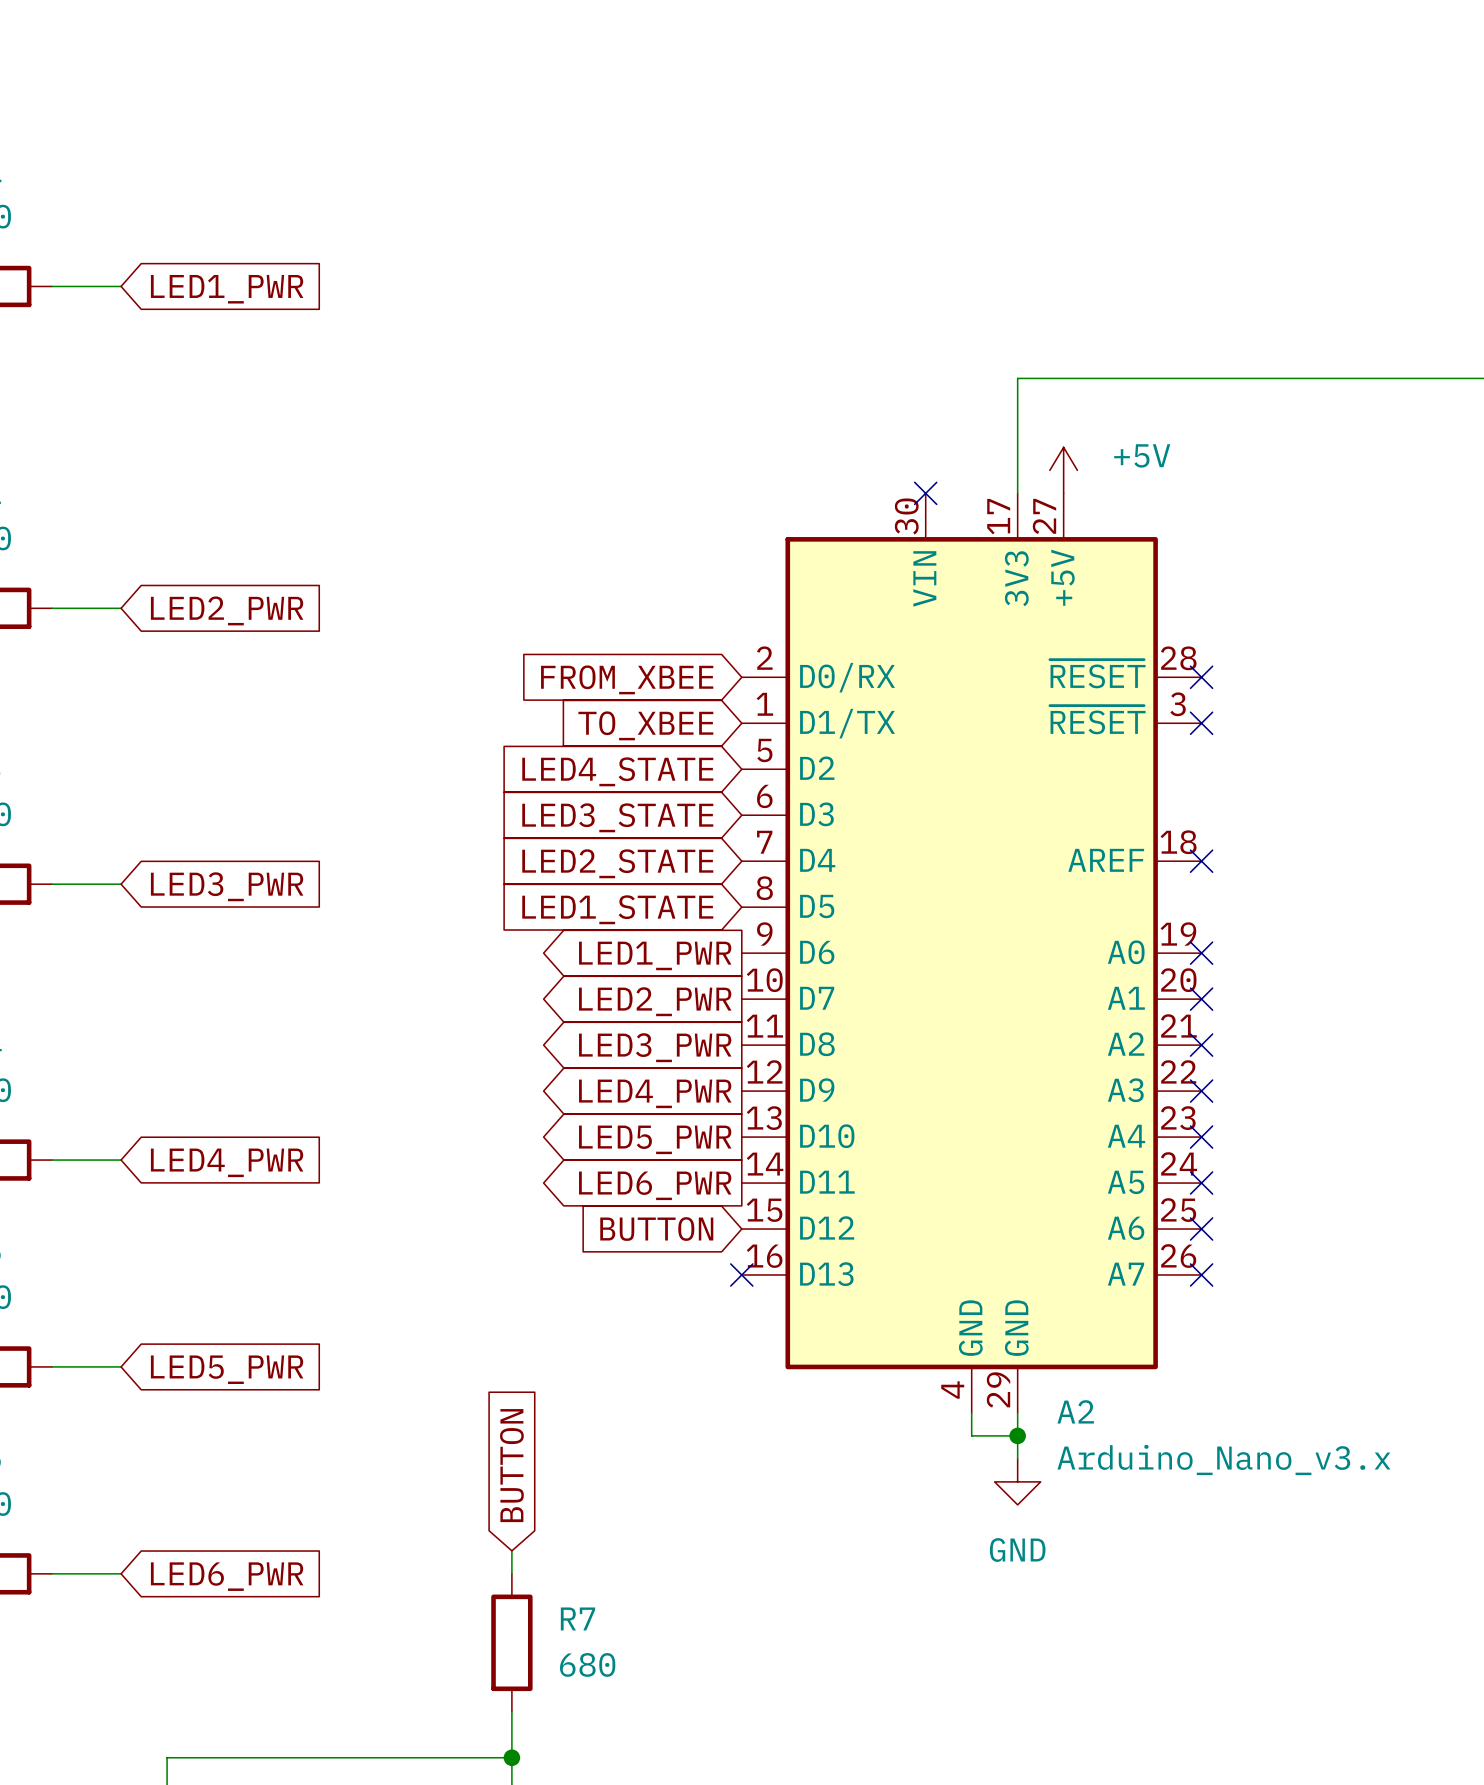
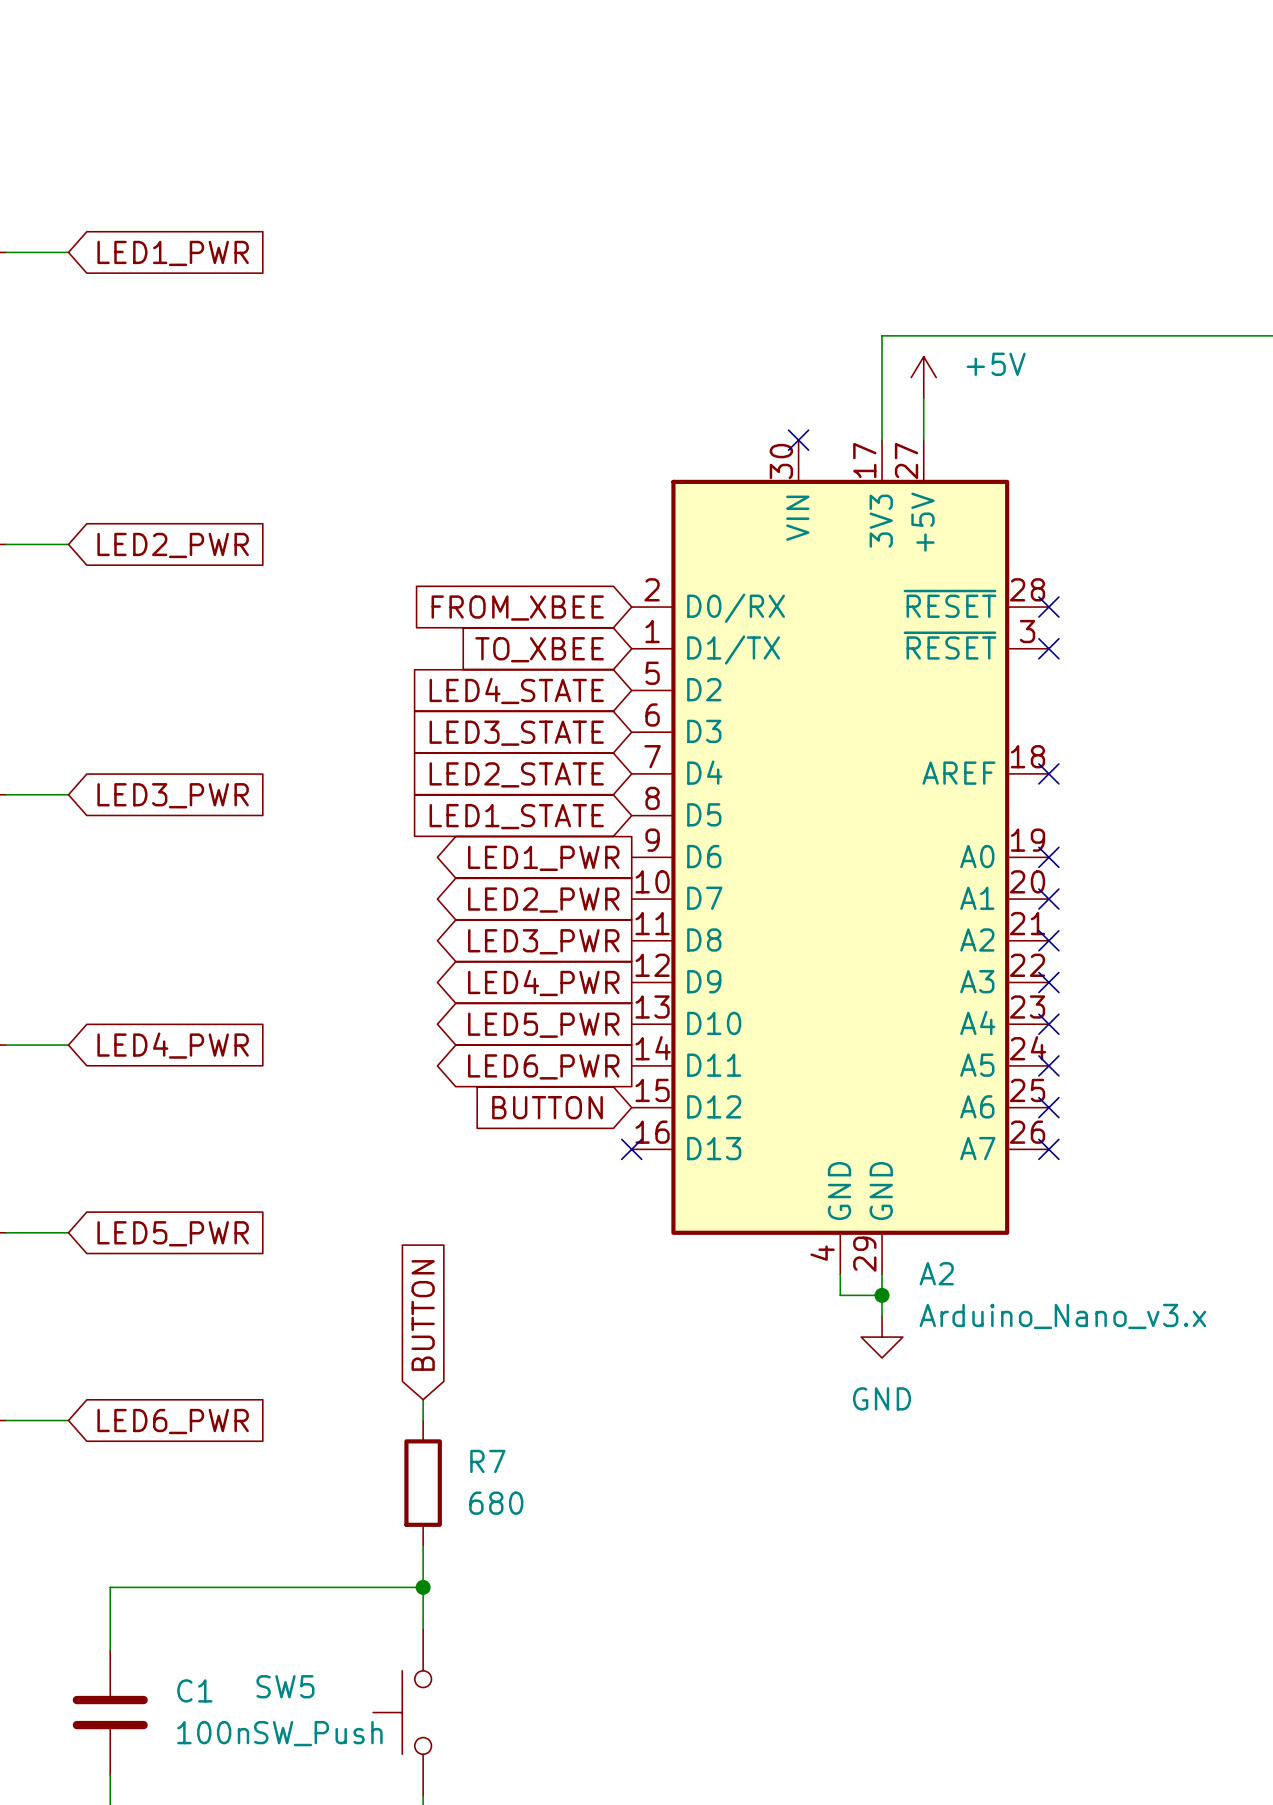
power symbol position: +5V (1063, 470) -> +5V (923, 377)

